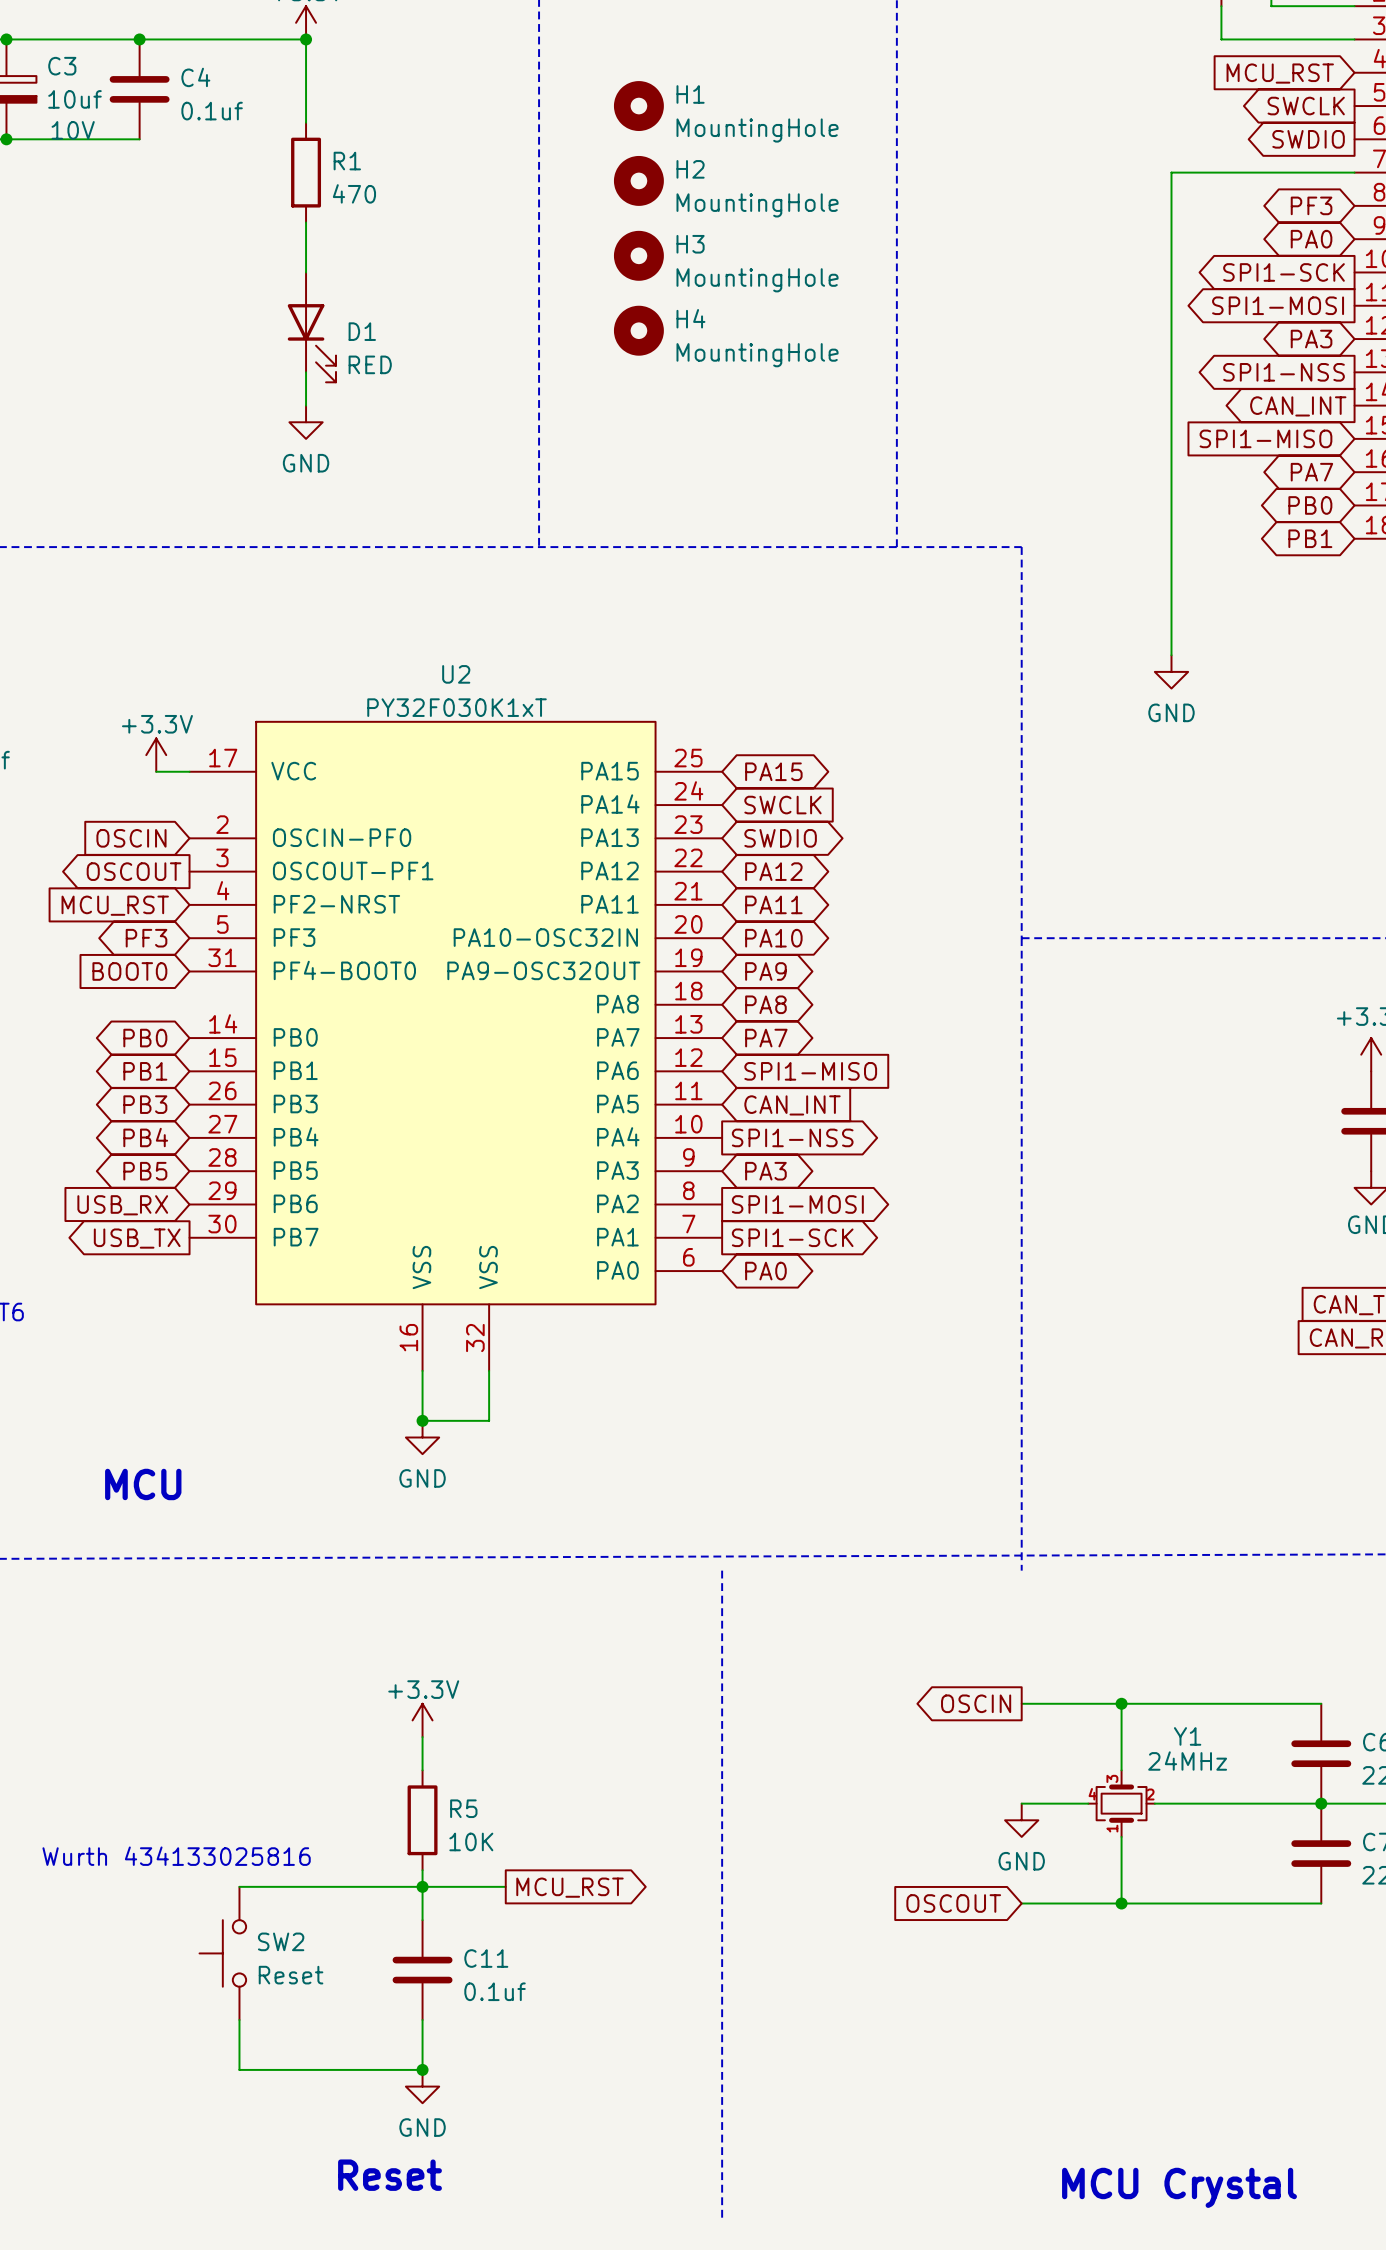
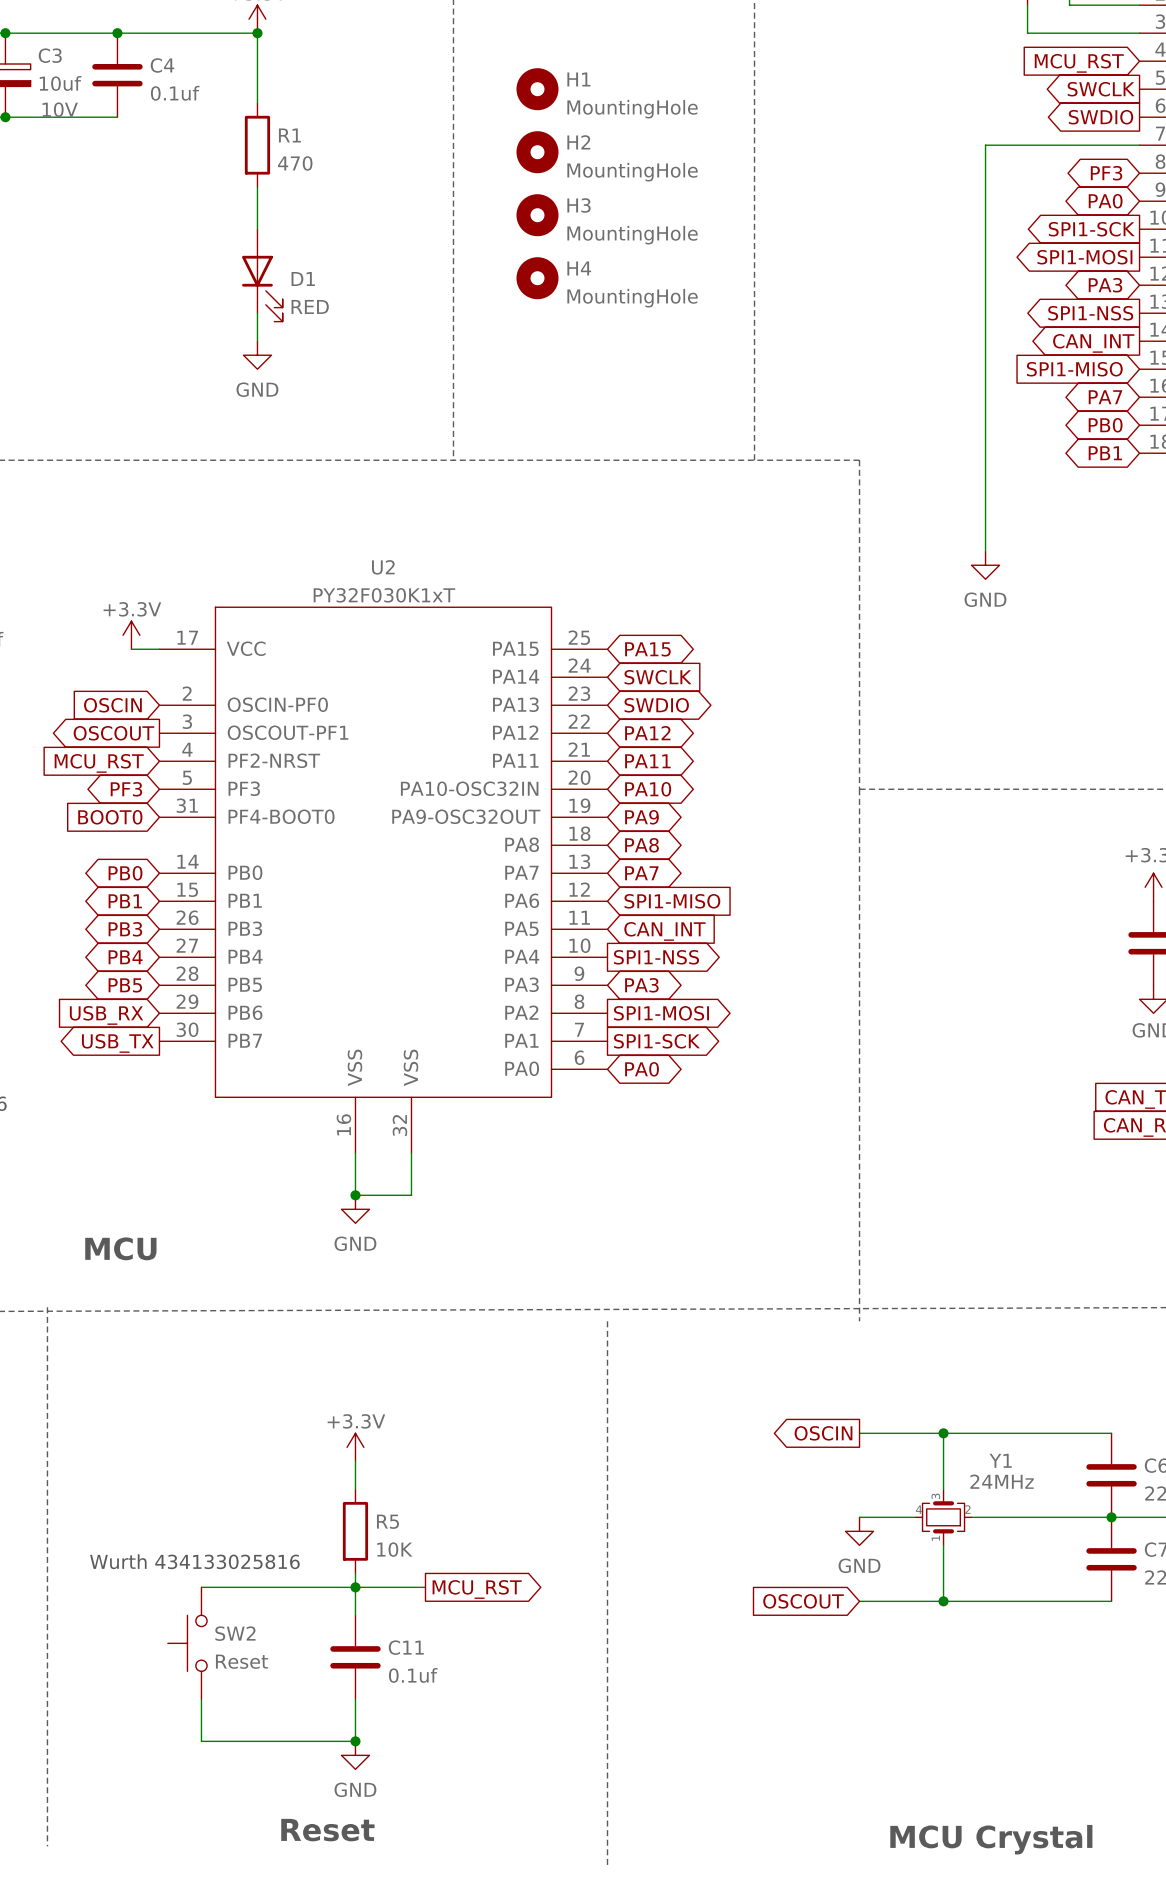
line: none -> (47, 1307) (47, 1846)
text position: Wurth 434133025816 (176, 1856) -> Wurth 434133025816 (194, 1561)

